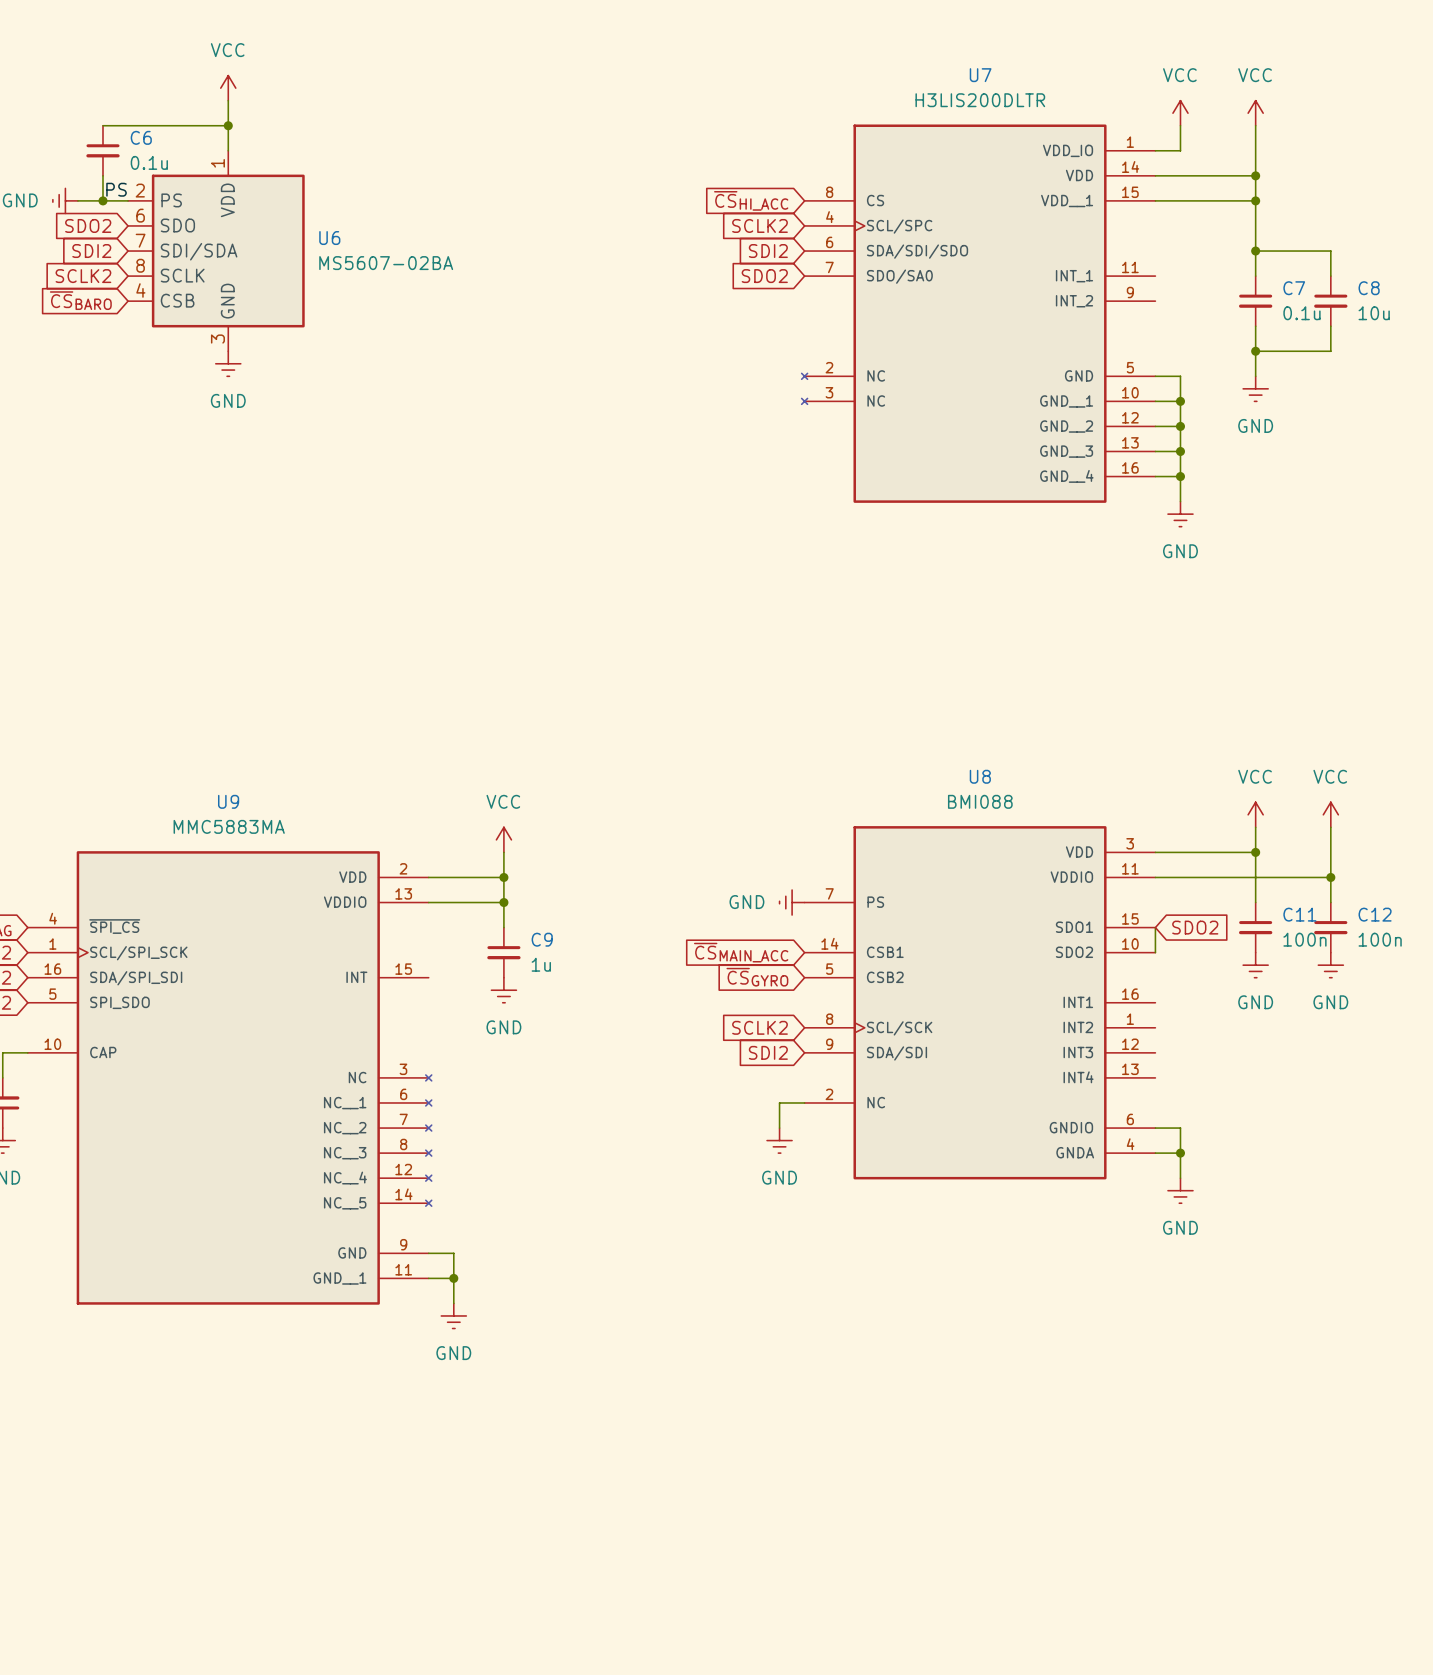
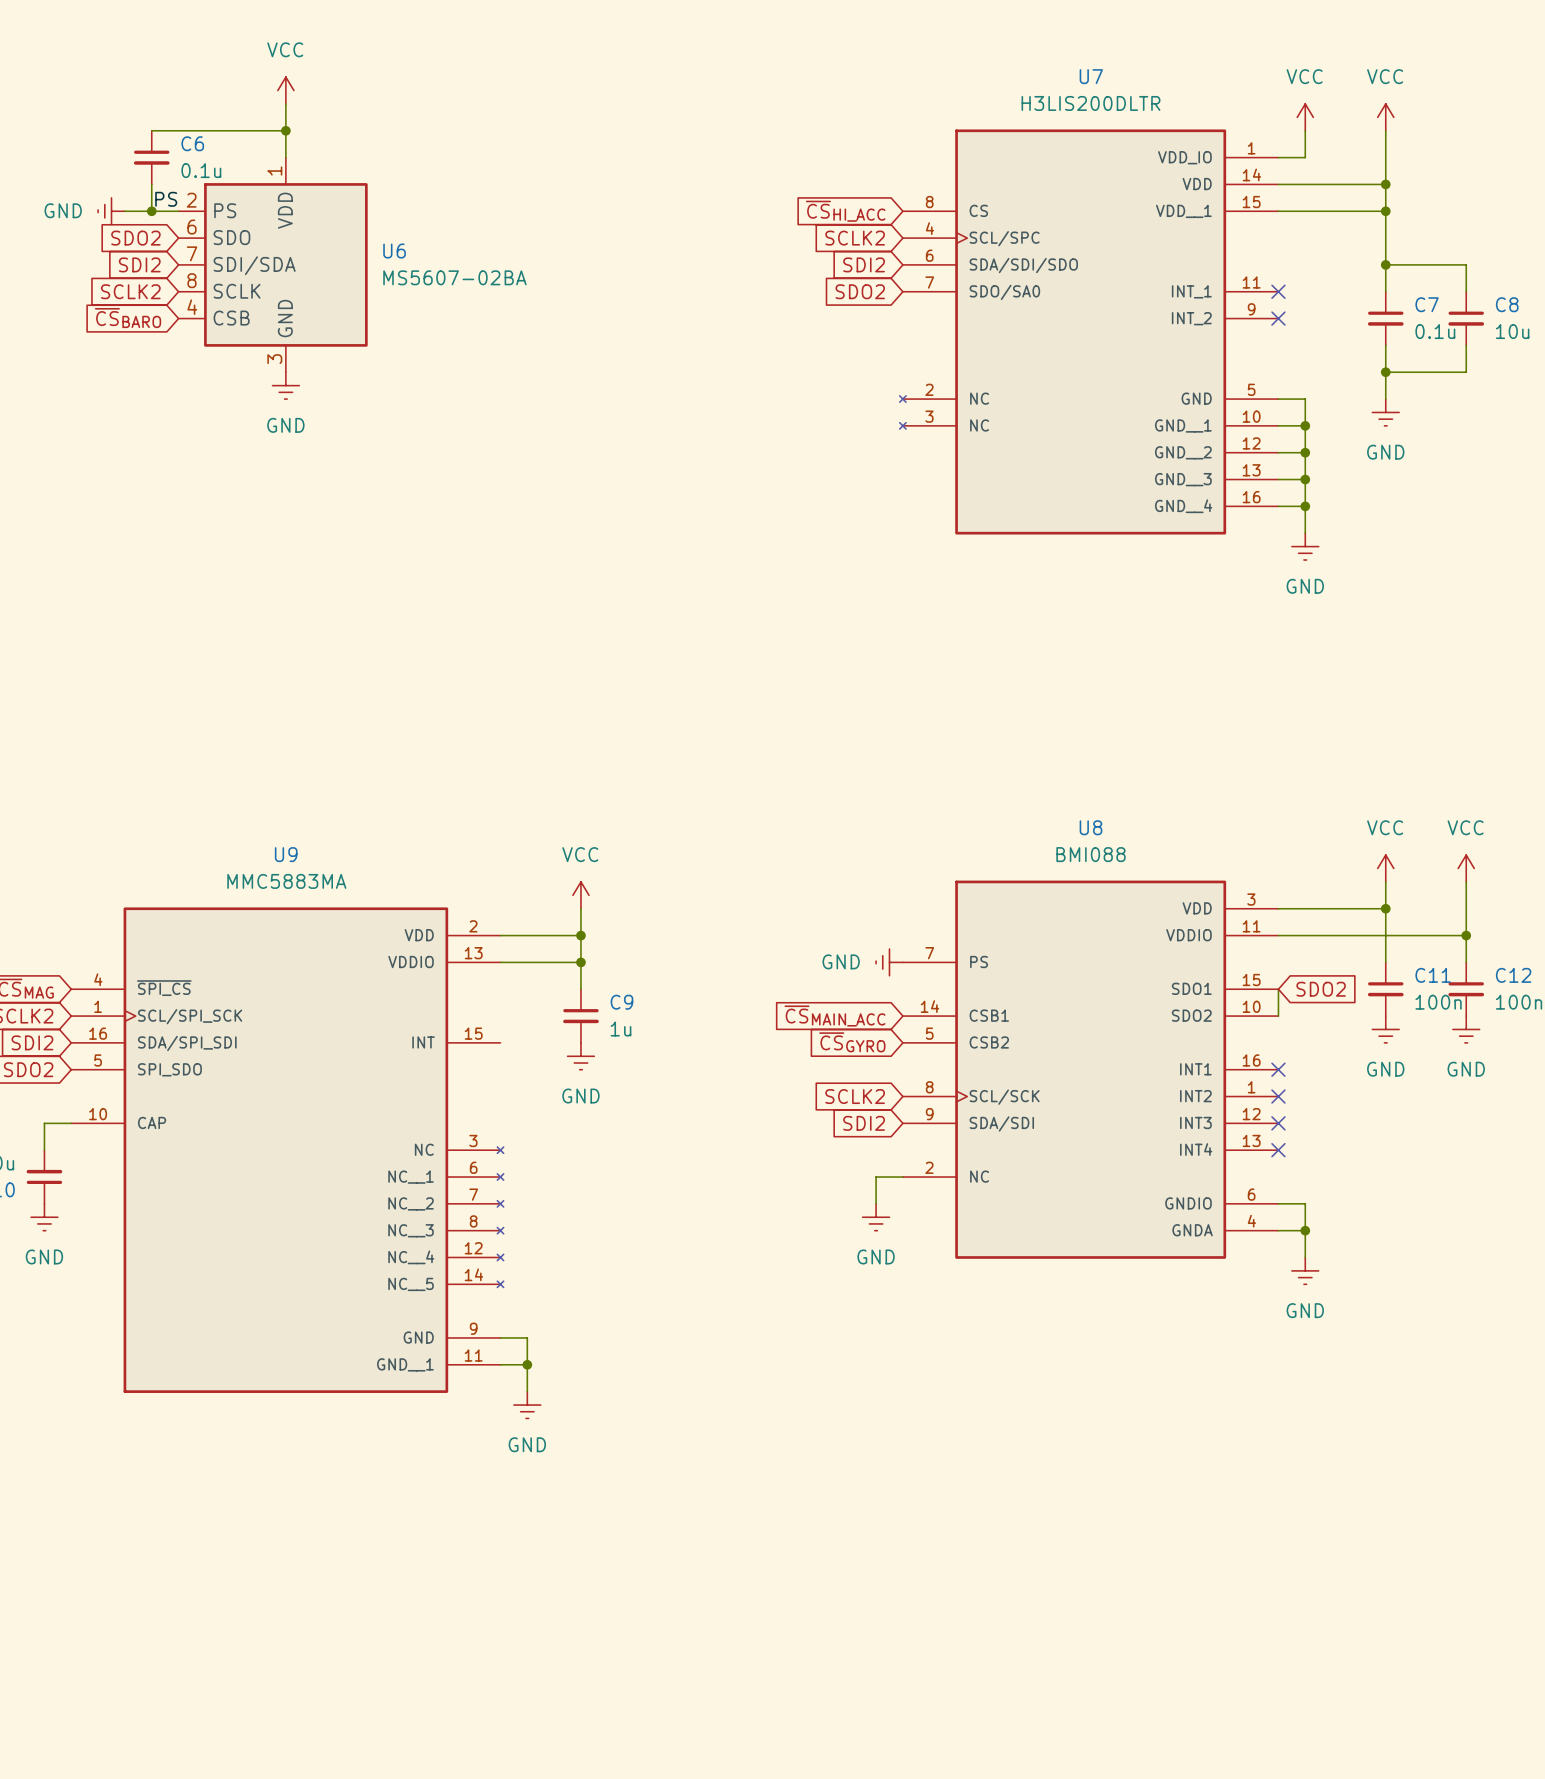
no-connect mark: none -> (1278, 291)
no-connect mark: none -> (1278, 318)
no-connect mark: none -> (1278, 1069)
no-connect mark: none -> (1278, 1096)
no-connect mark: none -> (1278, 1123)
no-connect mark: none -> (1278, 1150)

